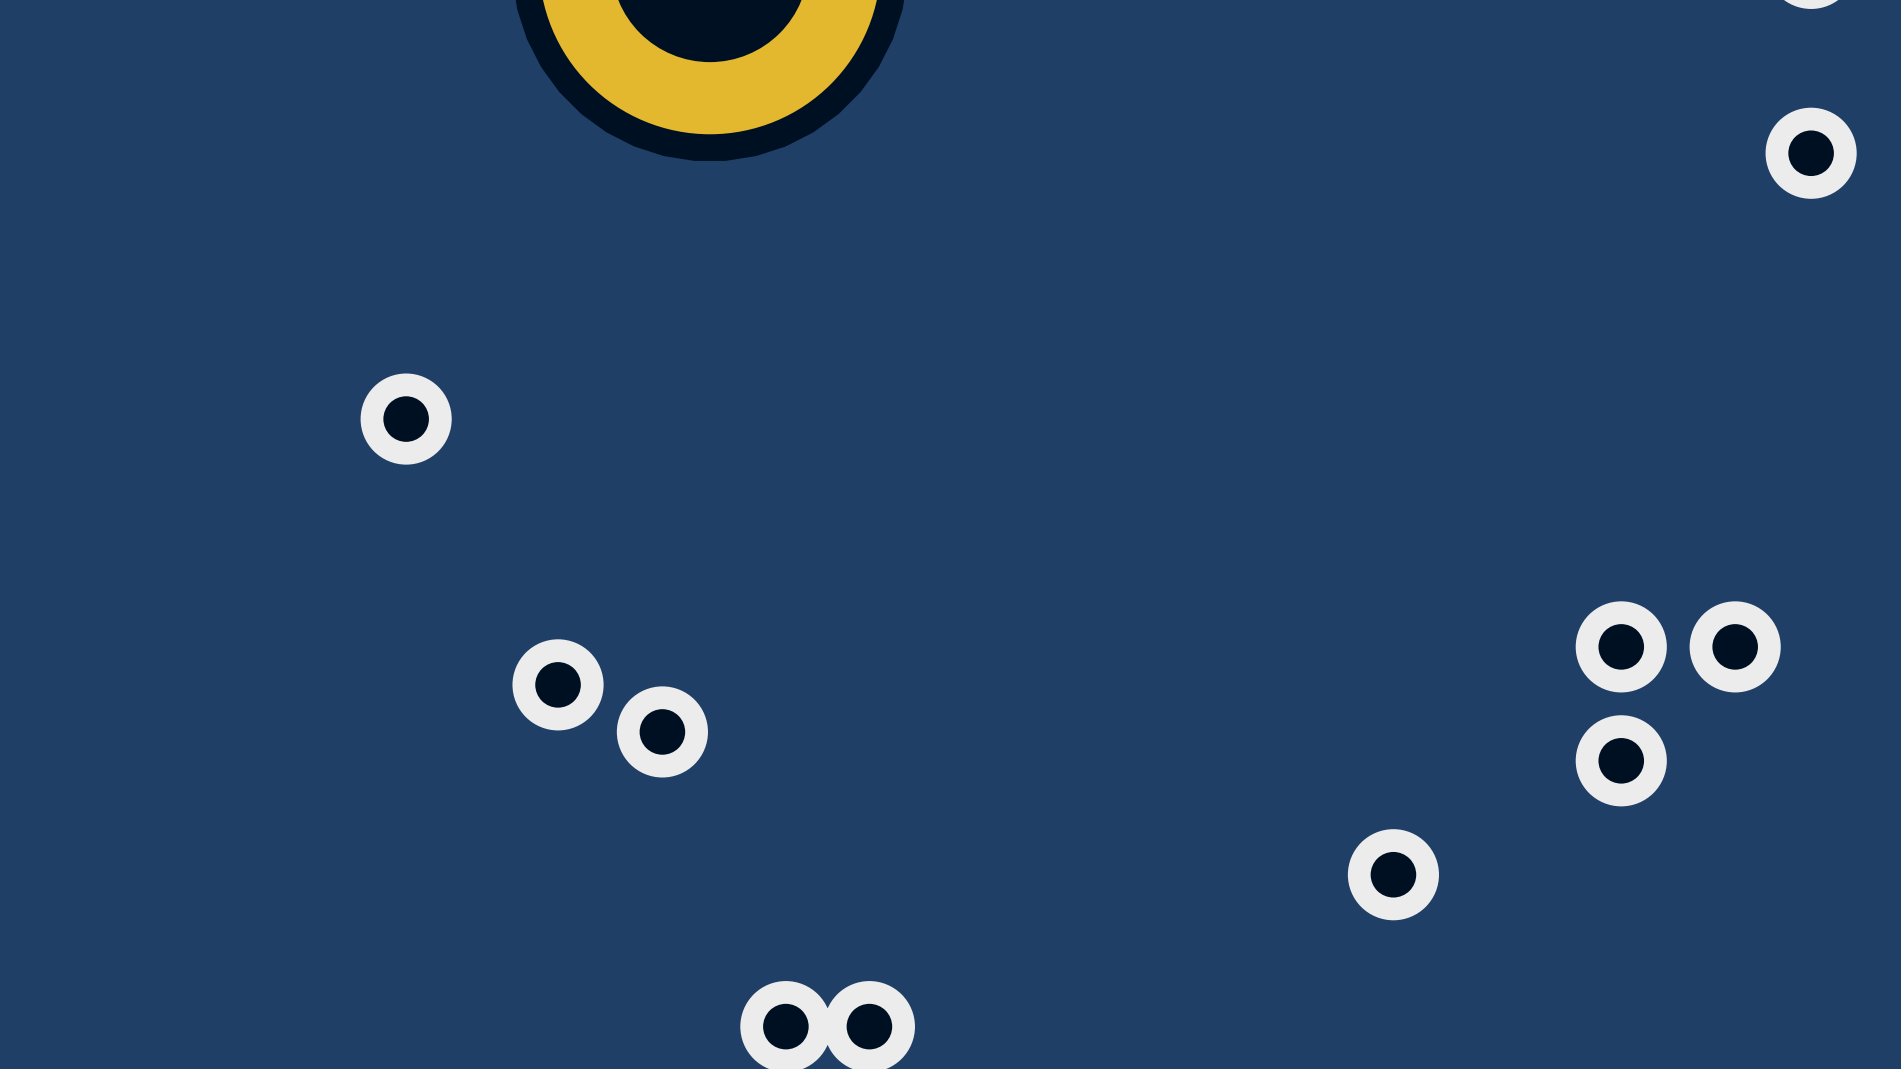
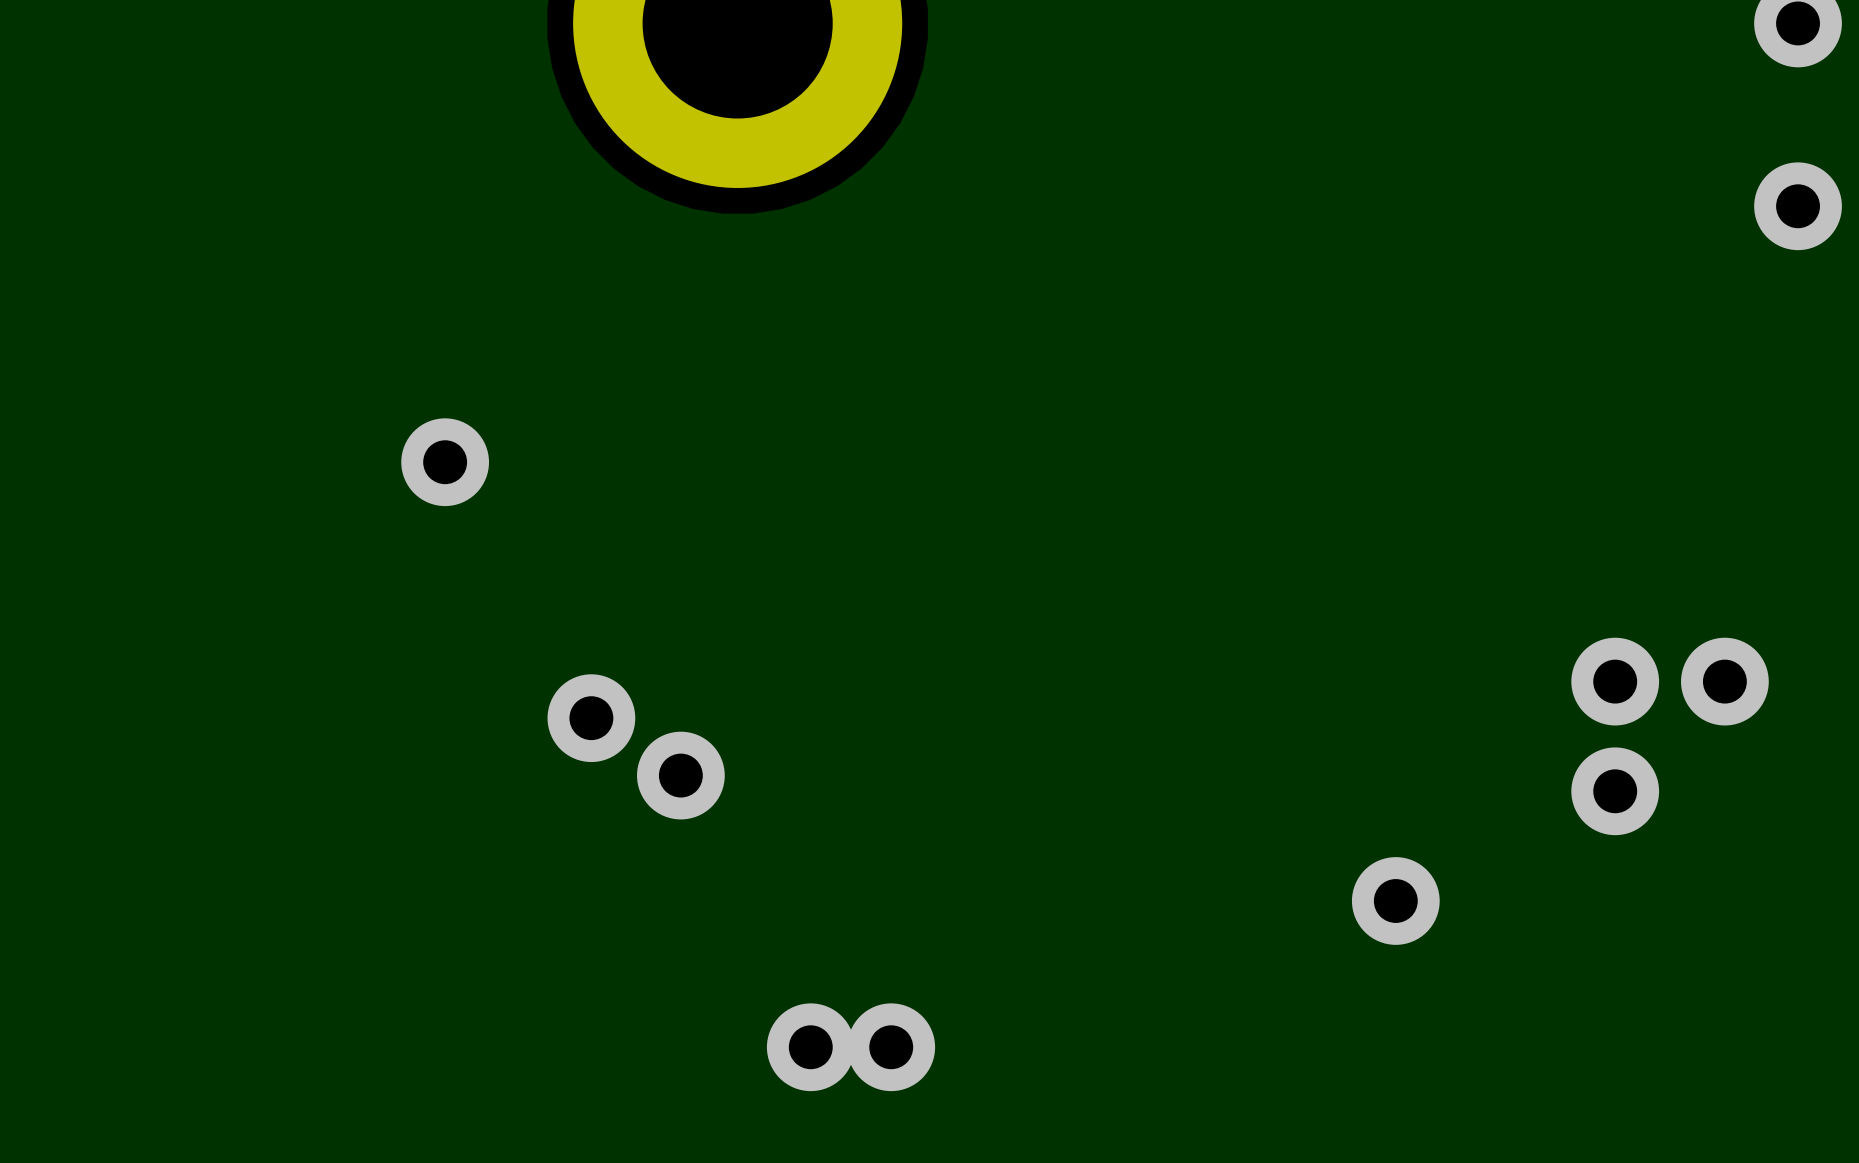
via position: (662, 731) -> (680, 775)

